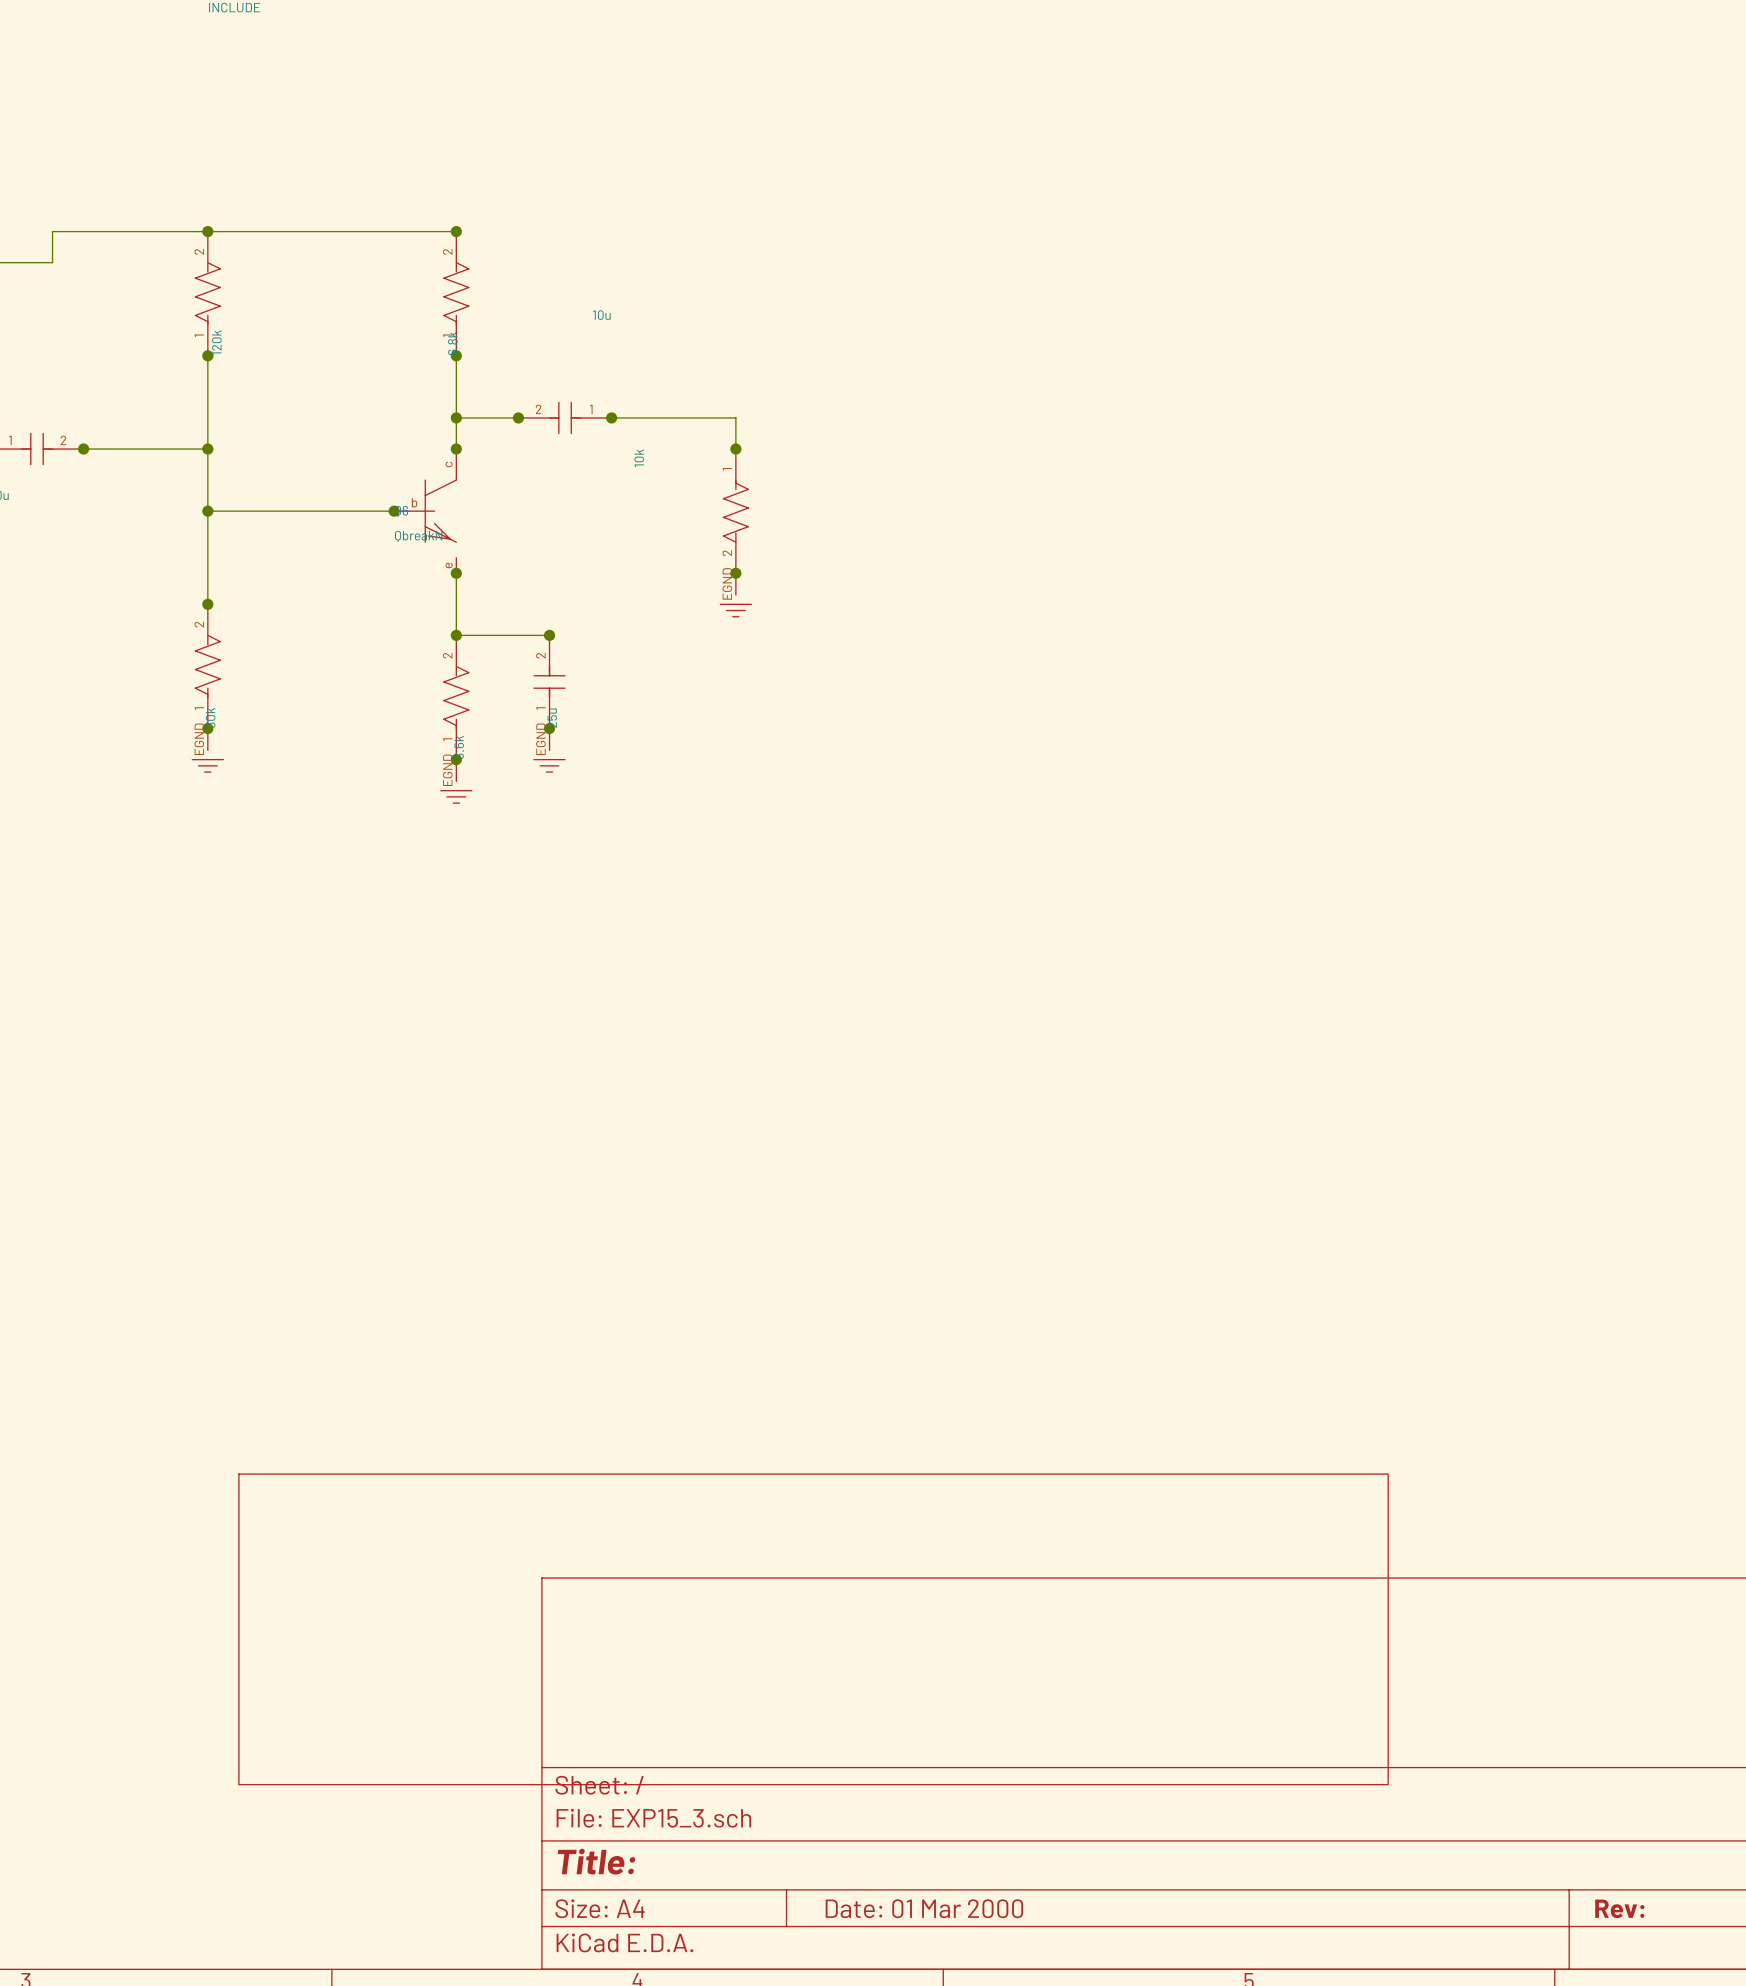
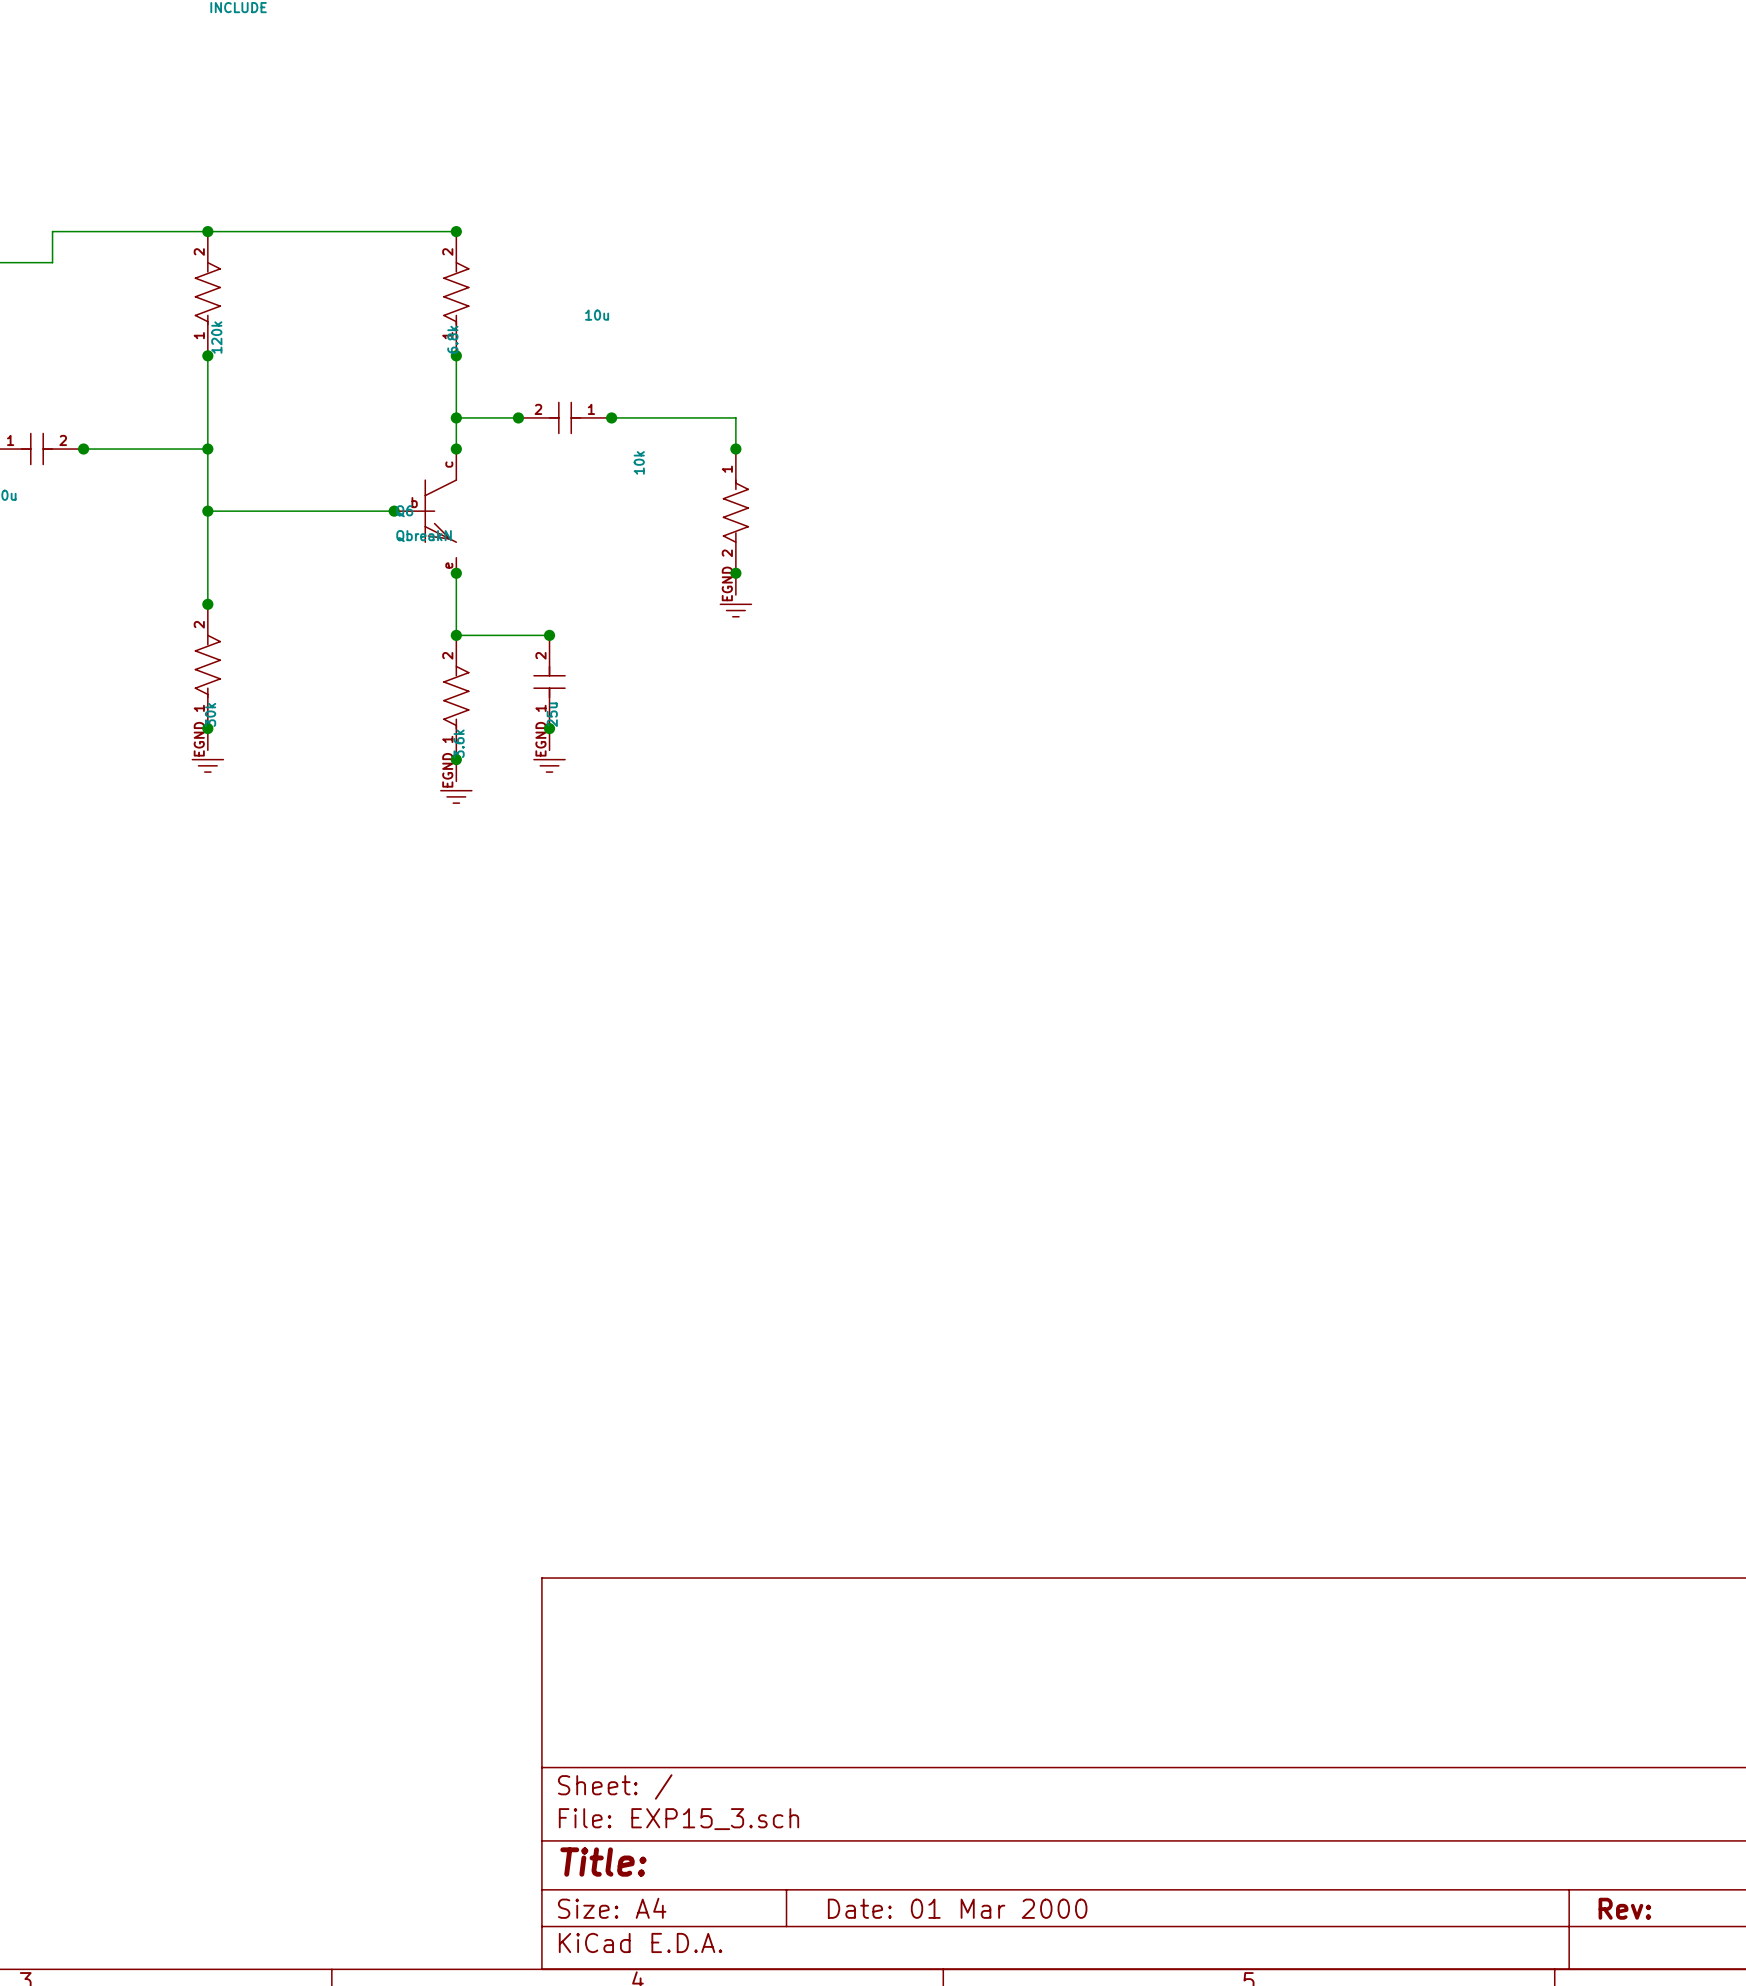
part: (813, 1629) -> none

